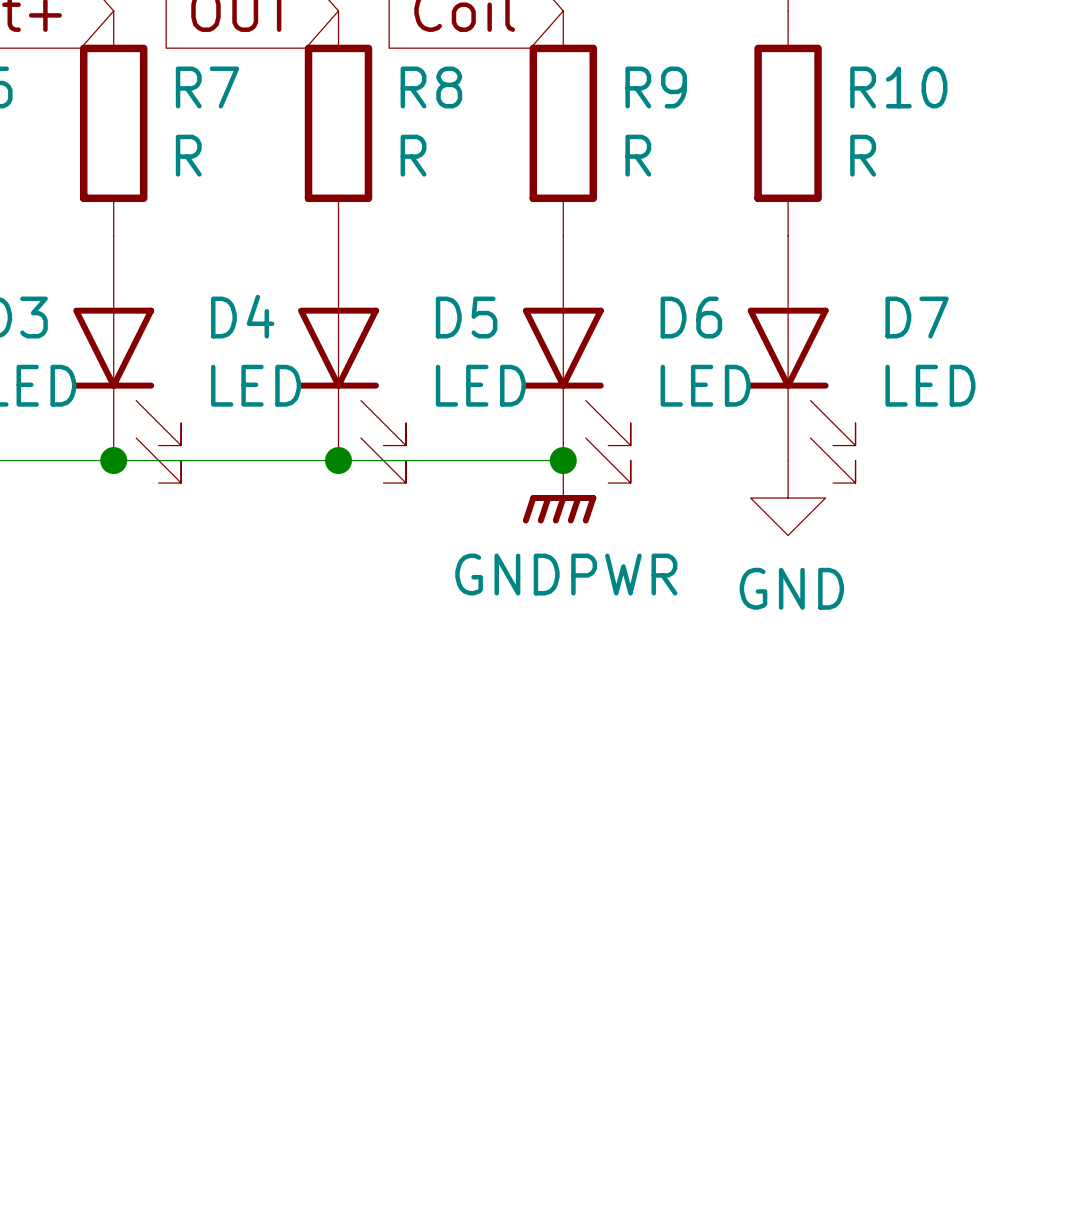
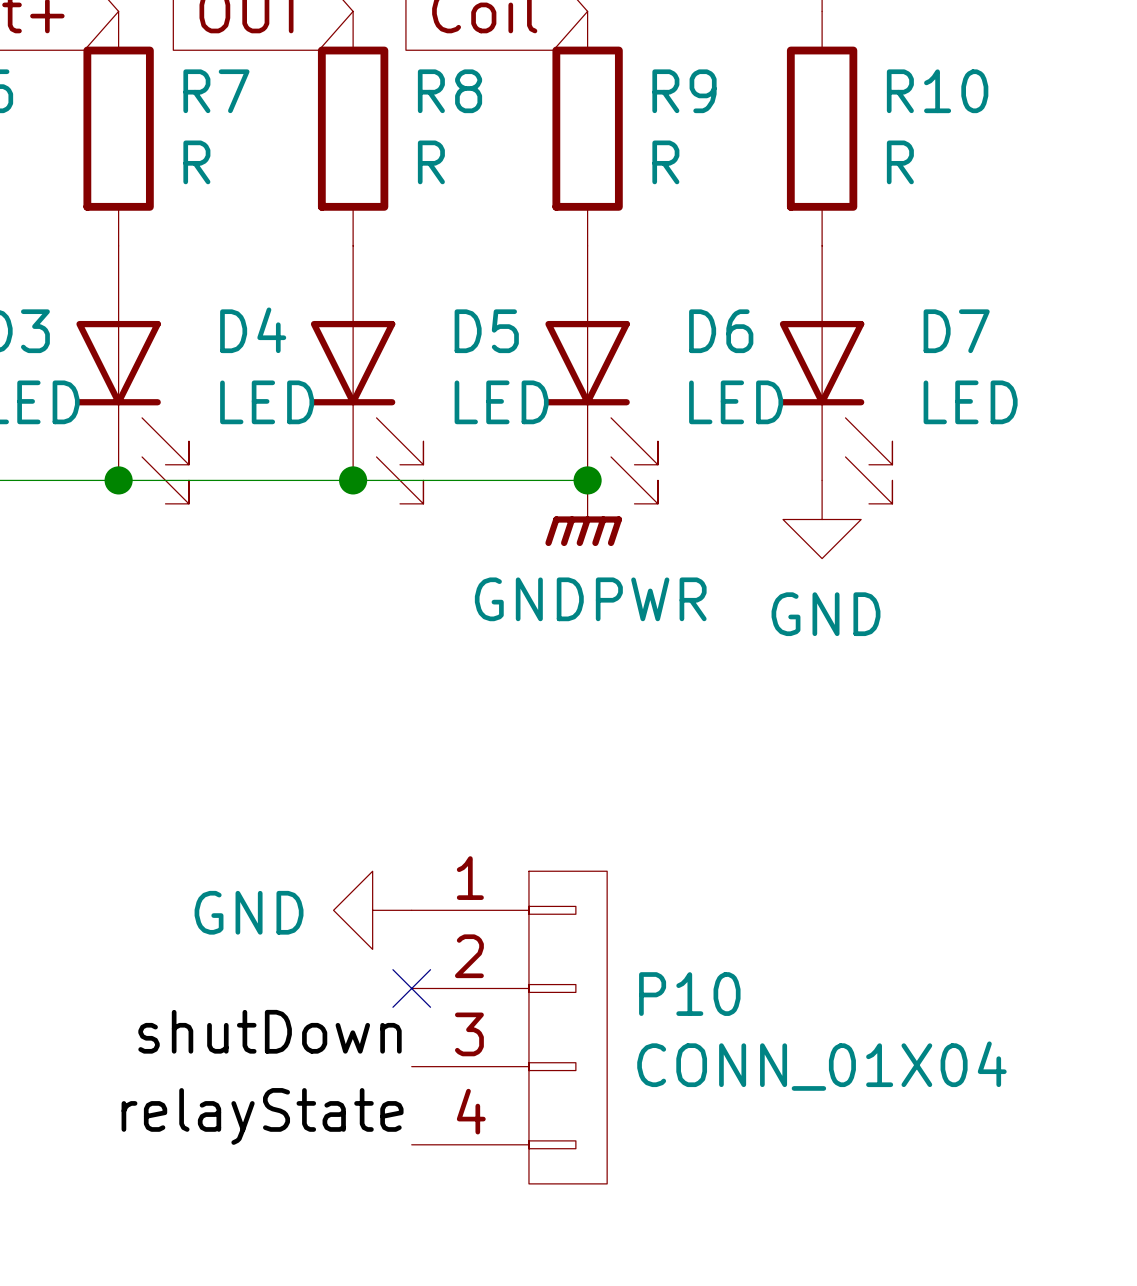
power symbol: none -> GND (372, 910)
no-connect mark: none -> (411, 988)
P10: none -> CONN_01X04 (509, 1027)
label: none -> shutDown (270, 1031)
label: none -> relayState (262, 1116)

